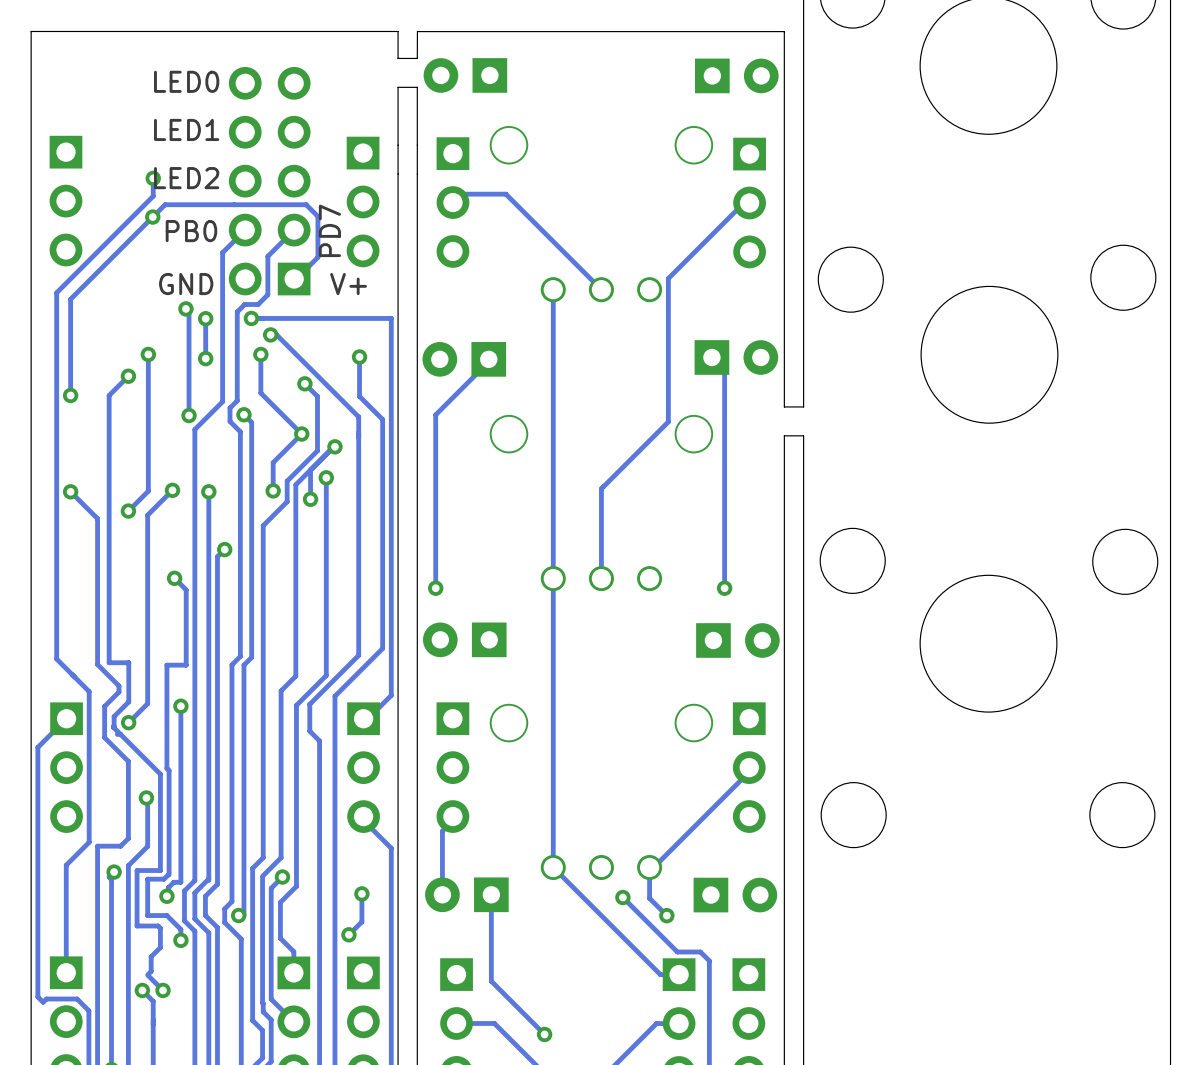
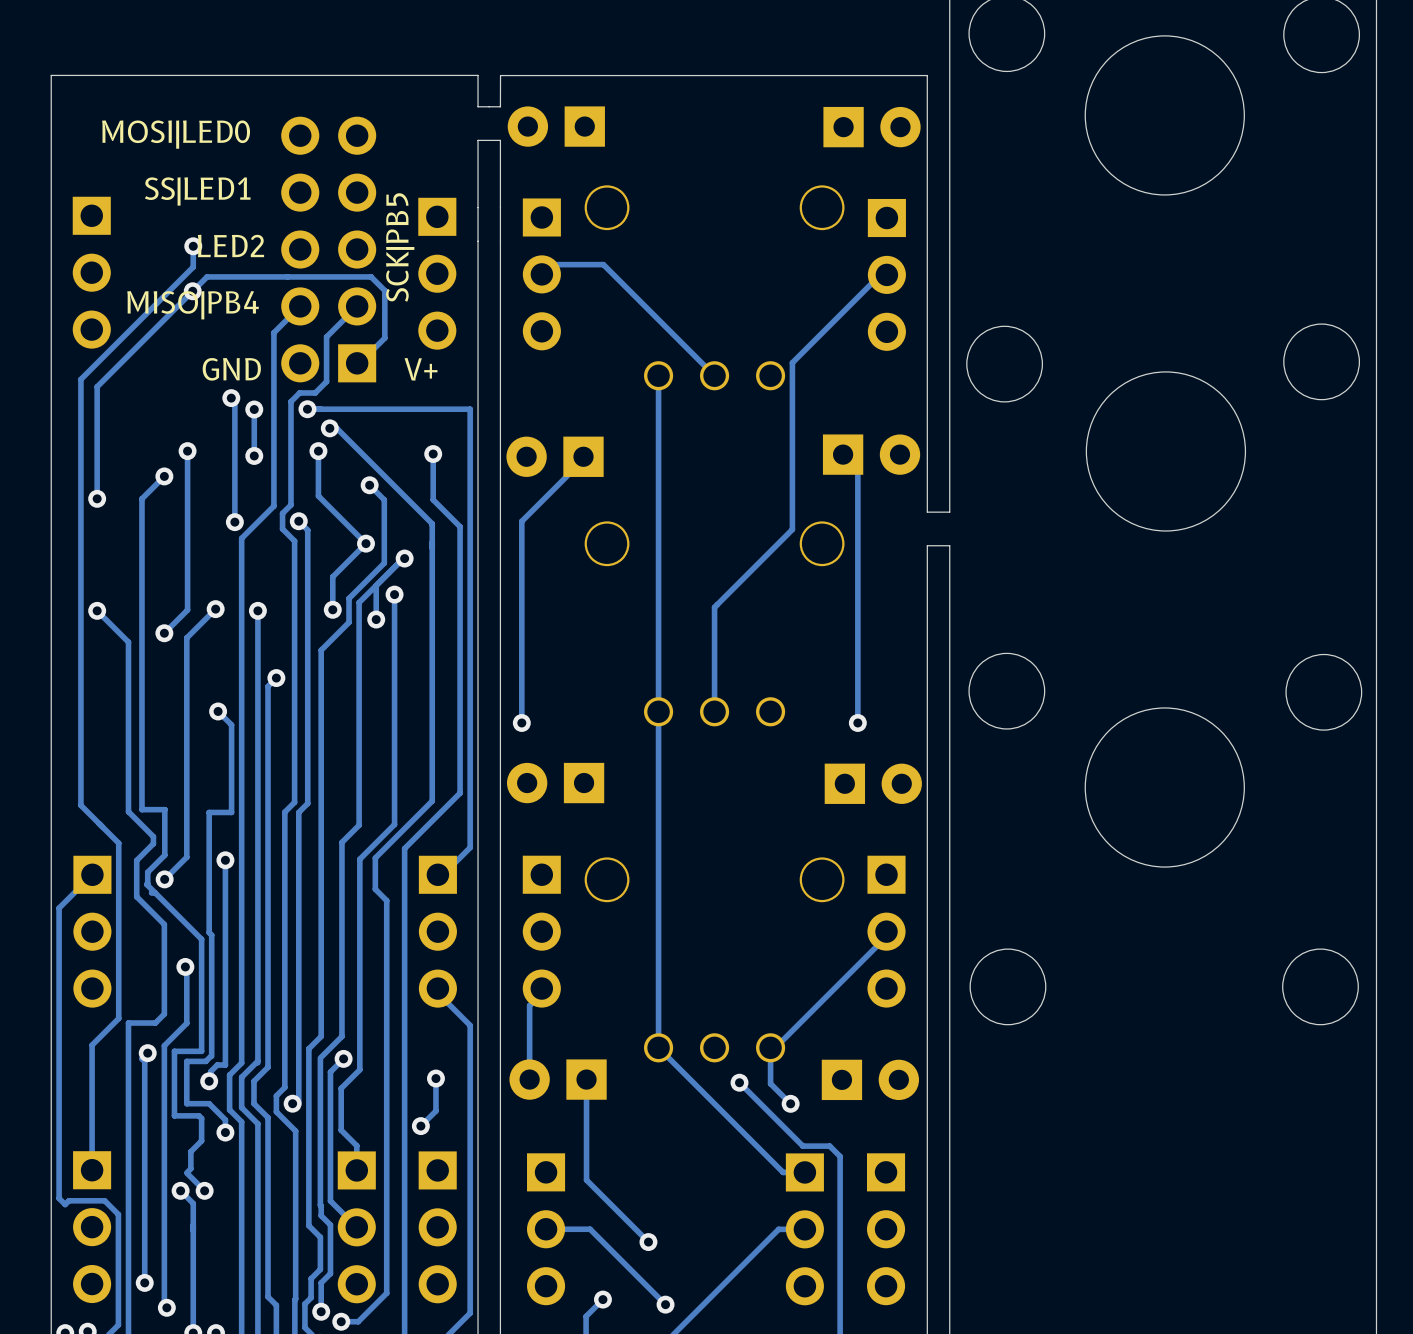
text: LED0 (186, 81) -> MOSI|LED0 (176, 134)
text: LED1 (186, 129) -> SS|LED1 (197, 191)
text: none -> SCK|PB5 (400, 247)
text: none -> MISO|PB4 (193, 305)
text: PD7 (329, 230) -> none
text: PB0 (191, 231) -> none

